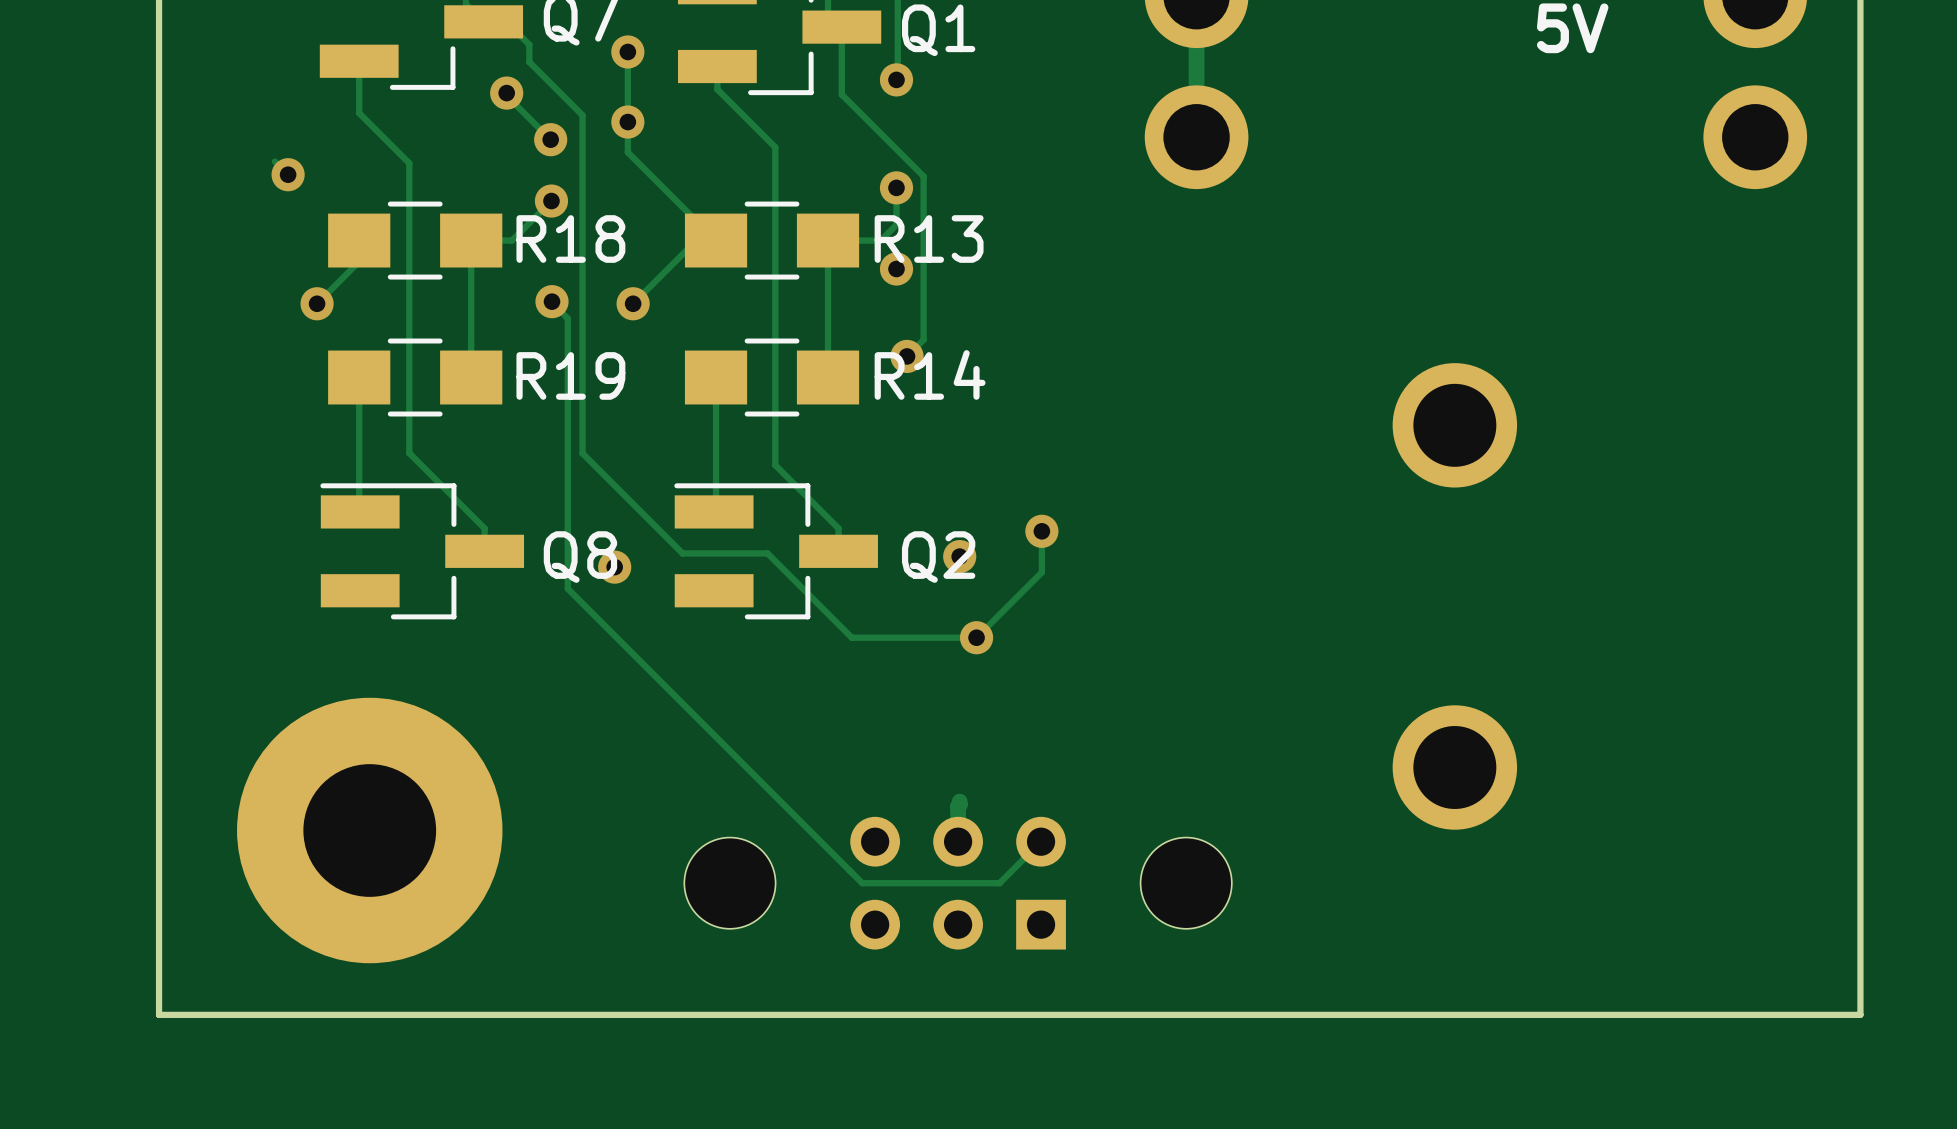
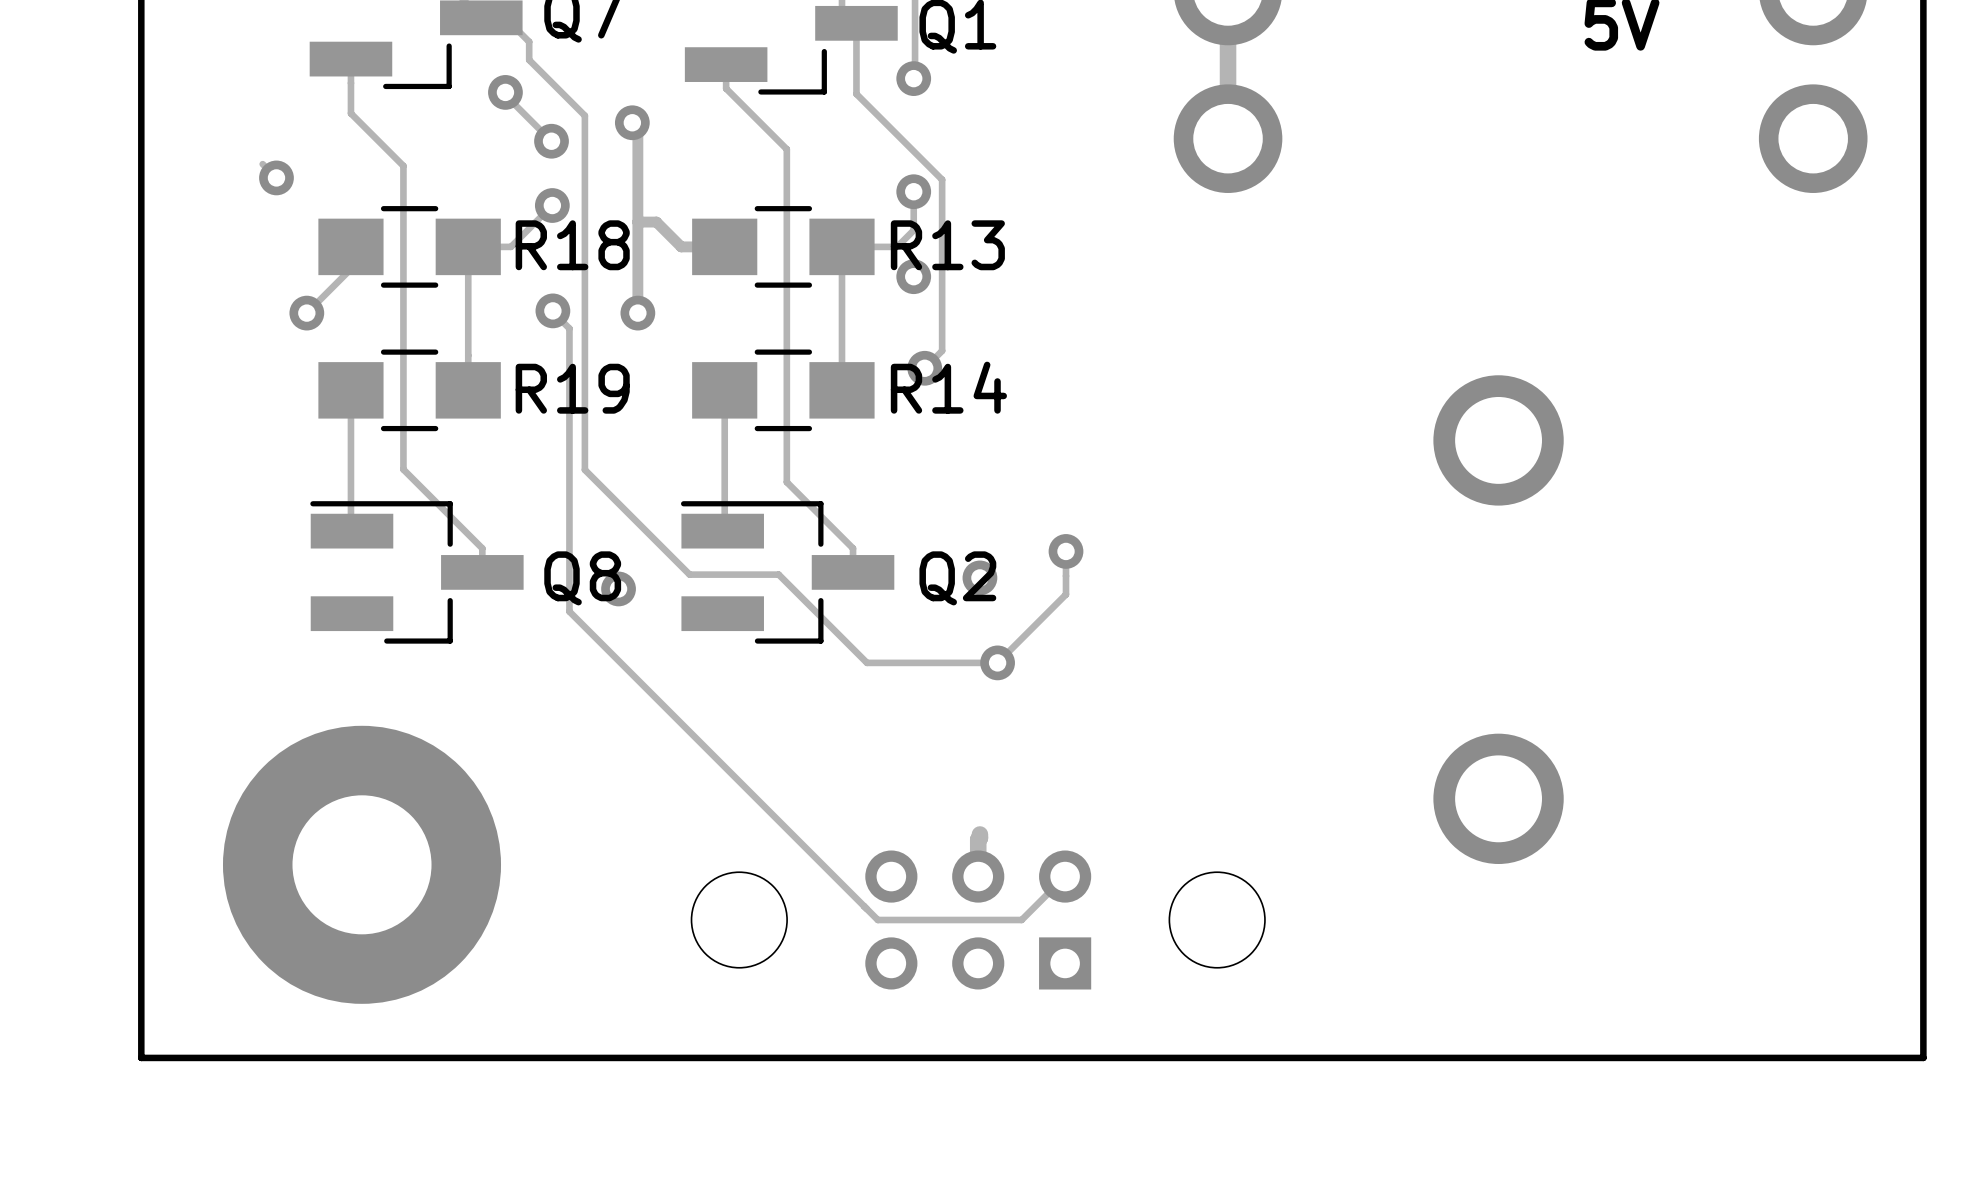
track: (627, 51) (627, 152) (716, 240) -> none
via: (627, 51) -> none
track: none -> (632, 122) (637, 128) (637, 313)
track: (696, 240) (633, 303) -> (704, 246) (681, 246) (656, 222) (637, 222)

